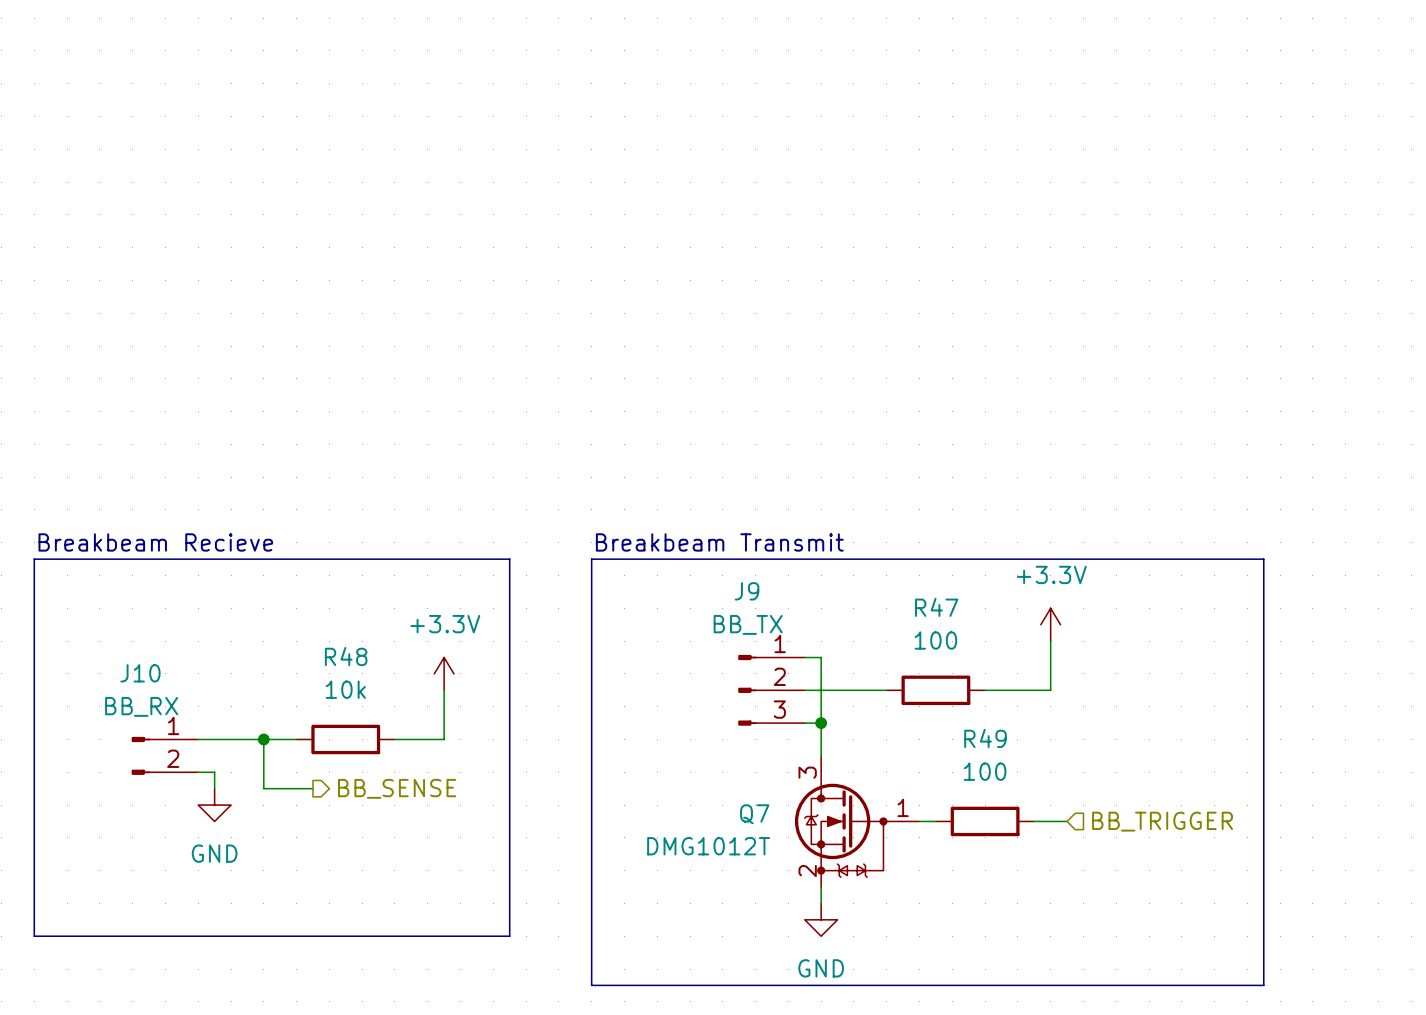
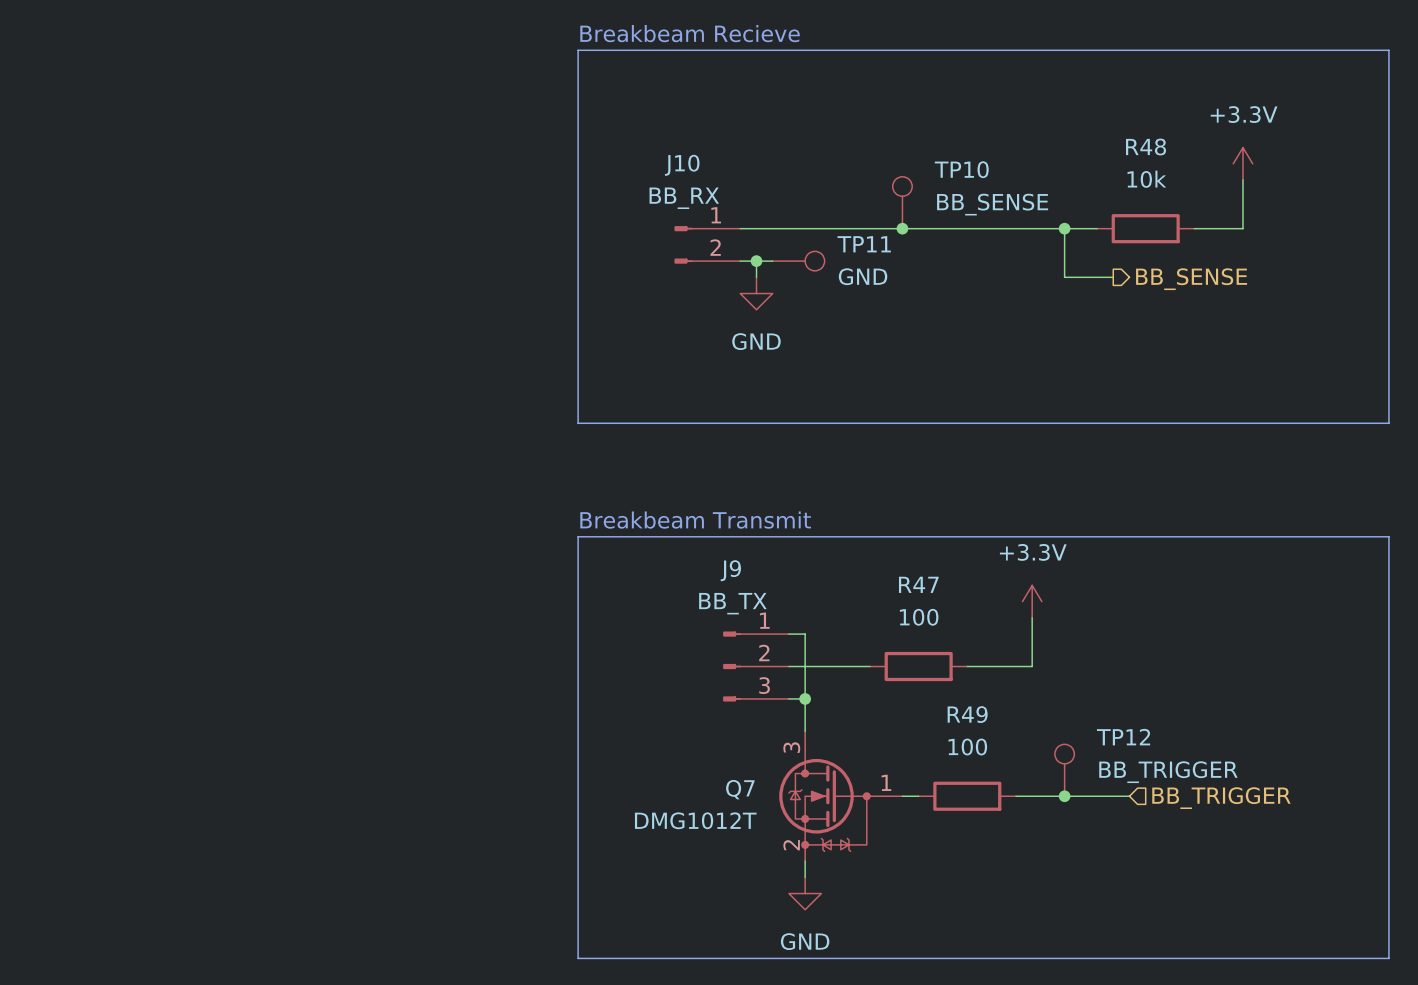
text: none -> Breakbeam Recieve (690, 33)
line: none -> (578, 50) (578, 423) (1388, 423) (1388, 50) (578, 50)
power symbol: none -> +3.3V (1243, 163)
wire: none -> (1243, 180) (1243, 228) (1194, 228)
TP10: none -> BB_SENSE (902, 202)
wire: none -> (740, 228) (1097, 228)
junction: none -> (902, 228)
wire: none -> (1064, 228) (1064, 277) (1113, 277)
junction: none -> (1064, 228)
wire: none -> (740, 261) (772, 261)
wire: none -> (756, 261) (756, 277)
junction: none -> (756, 261)
TP11: none -> GND (798, 261)
hierarchical label: none -> BB_SENSE (1191, 279)
power symbol: none -> GND (756, 293)
text: Breakbeam Recieve (155, 542) -> none
line: (34, 559) (509, 559) (509, 936) (34, 936) (34, 559) -> none
line: (1263, 559) (1263, 985) -> (1243, 536) (1388, 536) (1388, 958) (1243, 958)
power symbol: +3.3V (444, 673) -> none
wire: (444, 690) (444, 739) (394, 739) -> none
wire: (198, 739) (296, 739) -> none
wire: (263, 739) (263, 788) (312, 788) -> none
junction: (263, 739) -> none
R48 position: (345, 739) -> (1145, 228)
J10 position: (164, 755) -> (707, 244)
wire: (198, 772) (214, 772) (214, 788) -> none
hierarchical label: BB_SENSE (397, 788) -> none
TP12: none -> BB_TRIGGER (1064, 770)
power symbol: GND (214, 805) -> none
wire: none -> (1048, 796) (1129, 796)
junction: none -> (1064, 796)
hierarchical label position: BB_TRIGGER (1162, 821) -> BB_TRIGGER (1221, 798)

